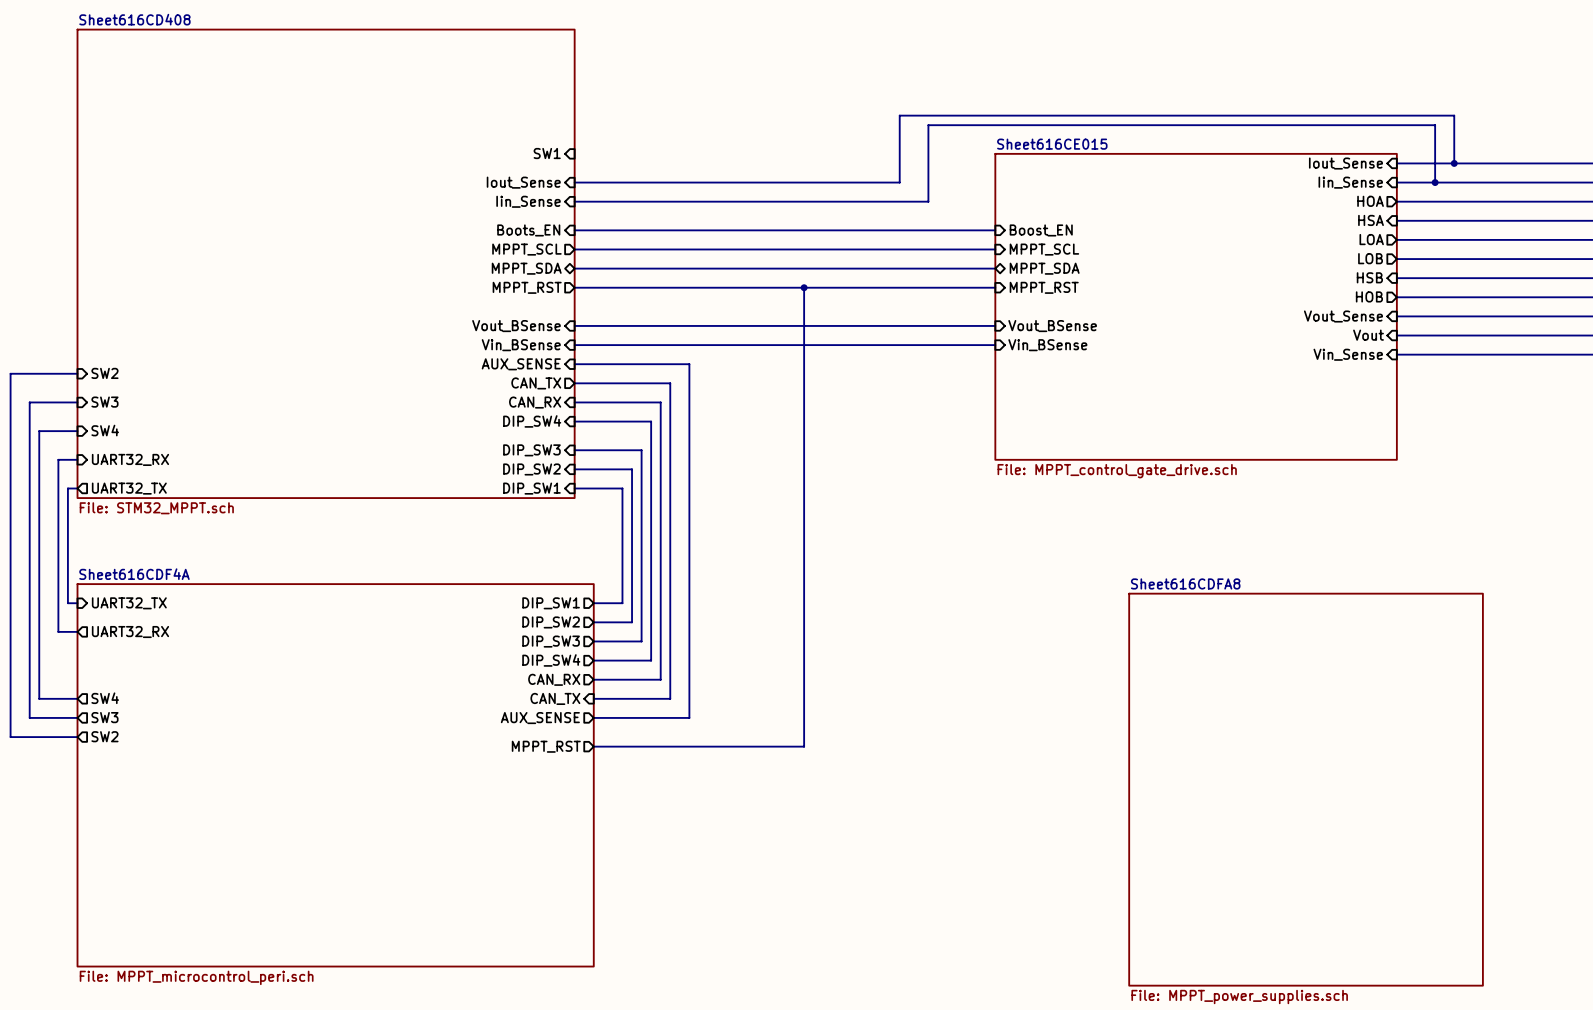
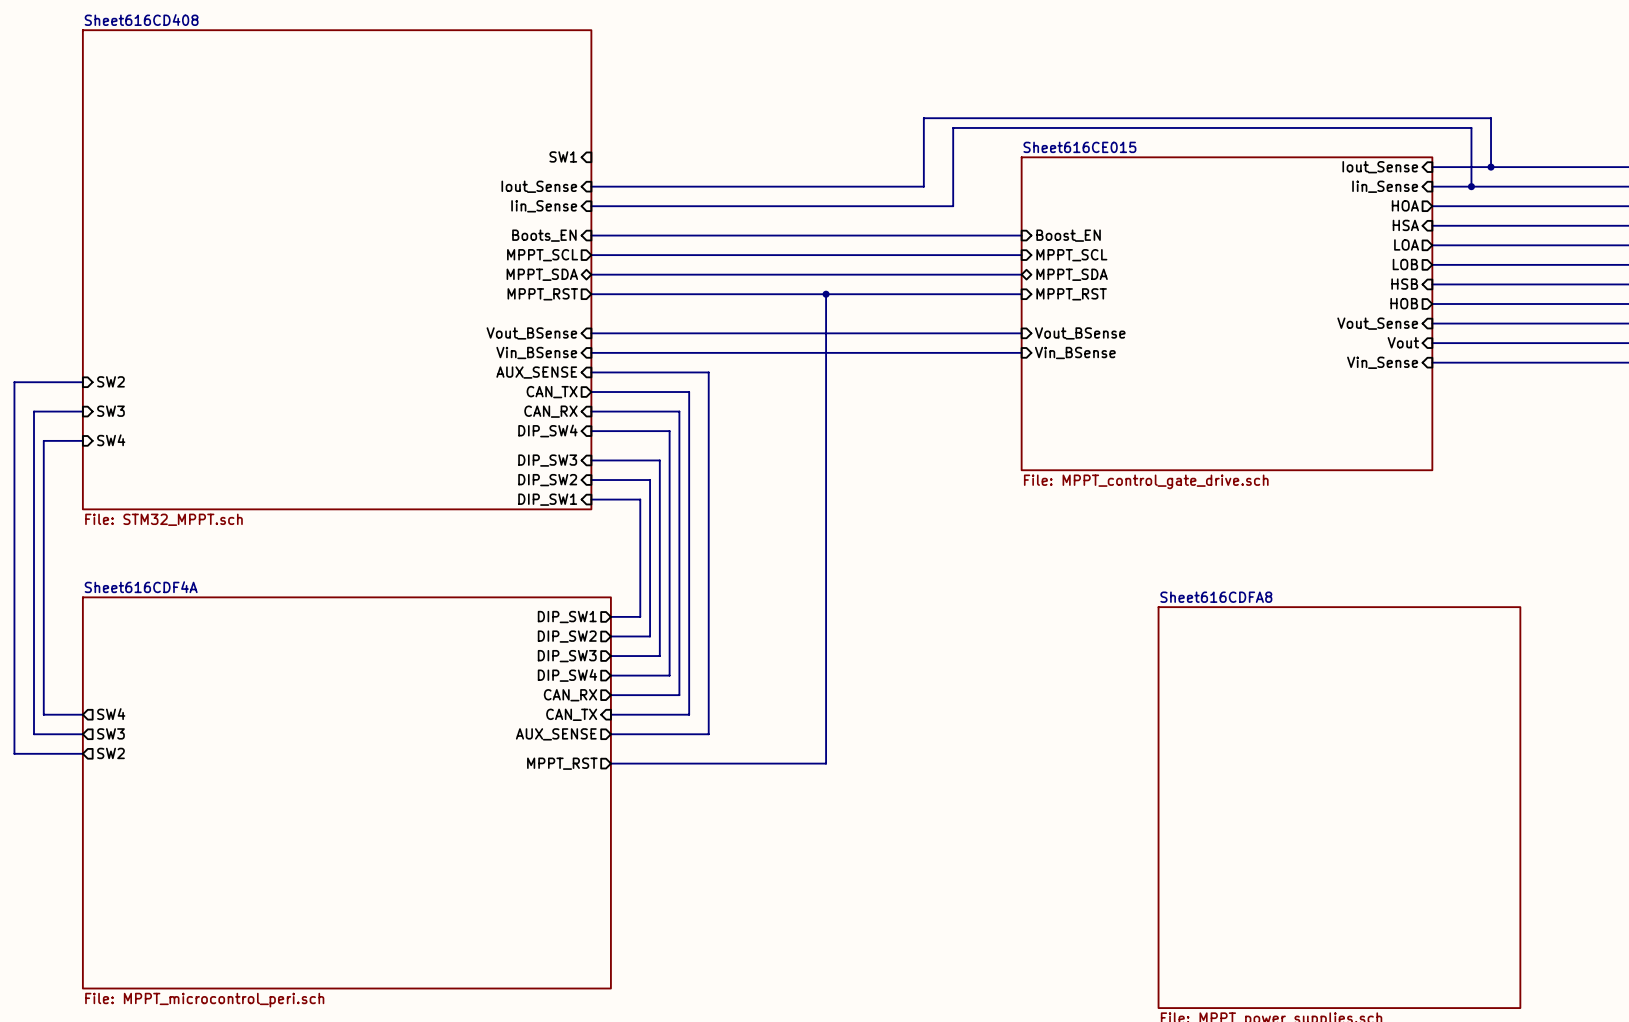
wire: (77, 459) (58, 459) (58, 631) (77, 631) -> none
sheet pin: UART32_RX (130, 459) -> none
wire: (77, 488) (67, 488) (67, 603) (77, 603) -> none
sheet pin: UART32_TX (129, 488) -> none
sheet pin: UART32_TX (129, 603) -> none
sheet pin: UART32_RX (130, 632) -> none

